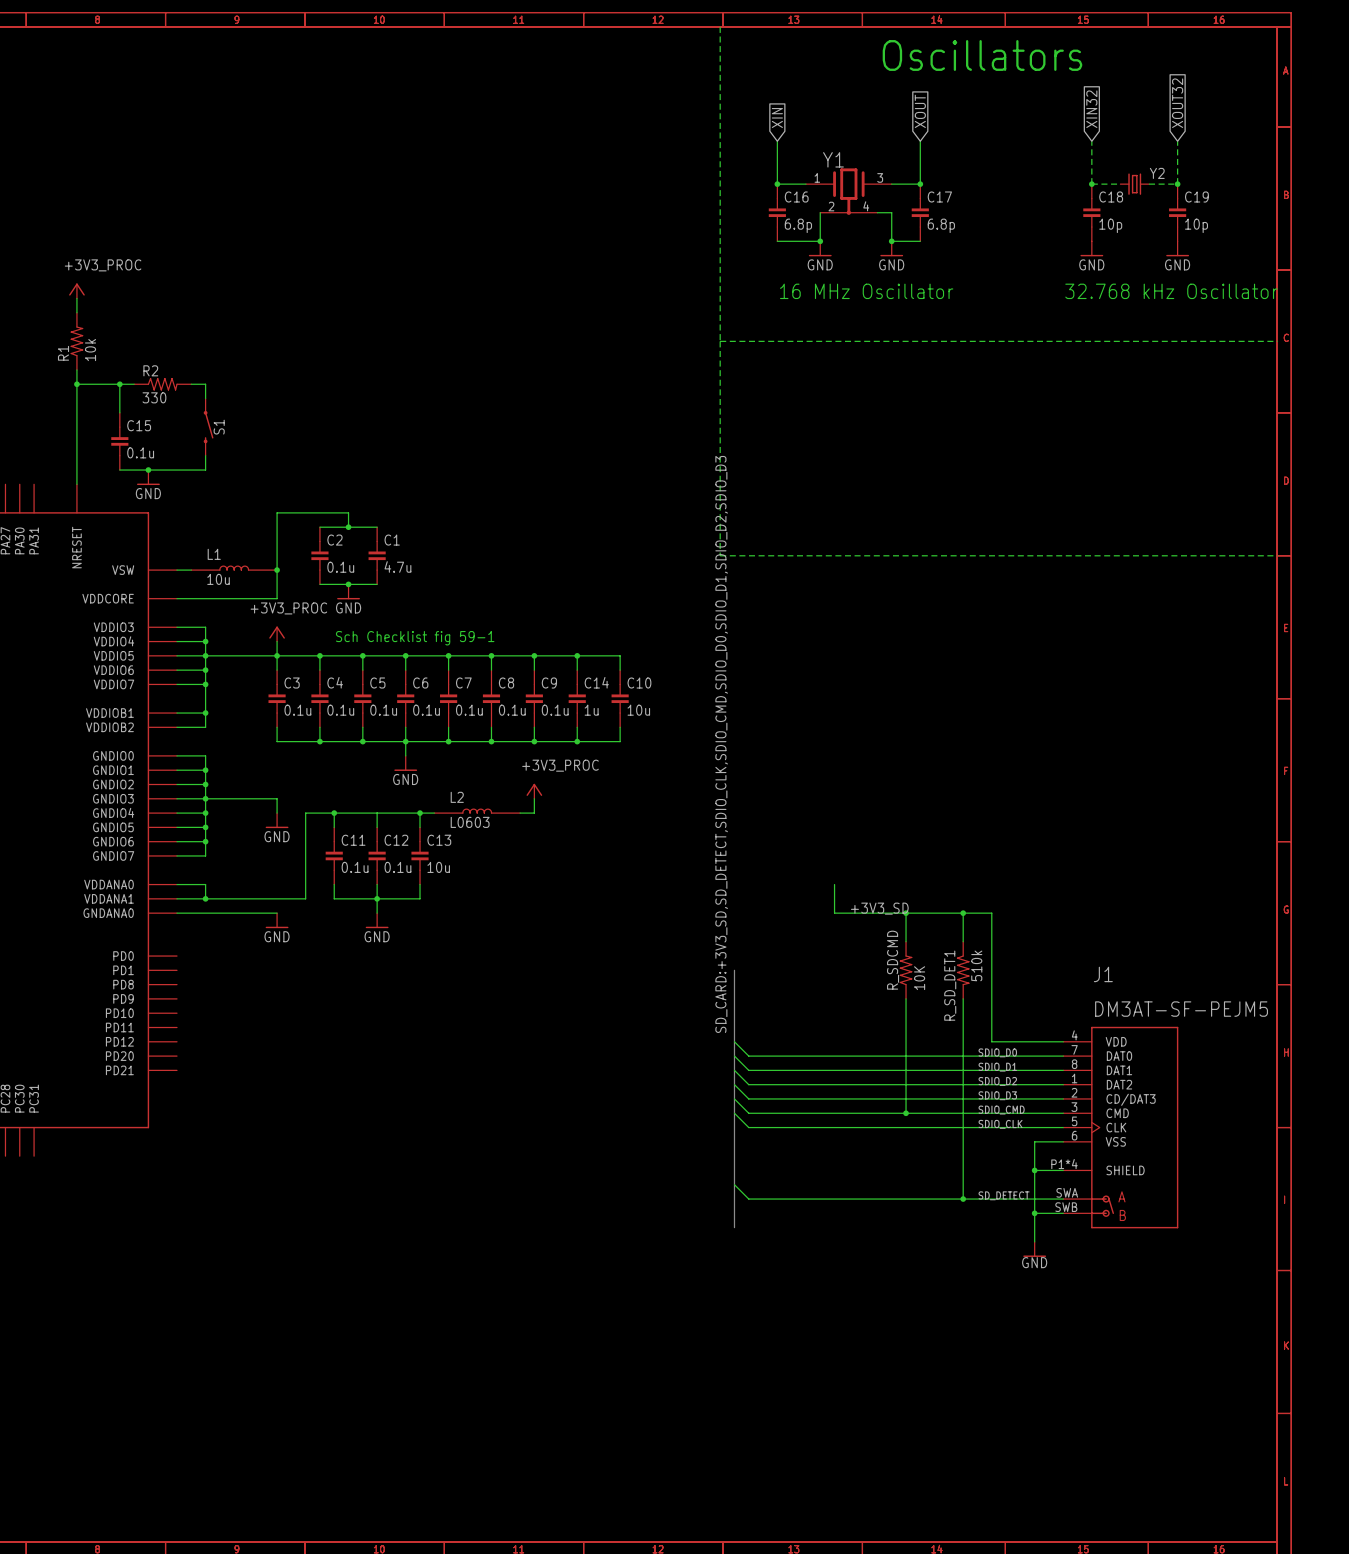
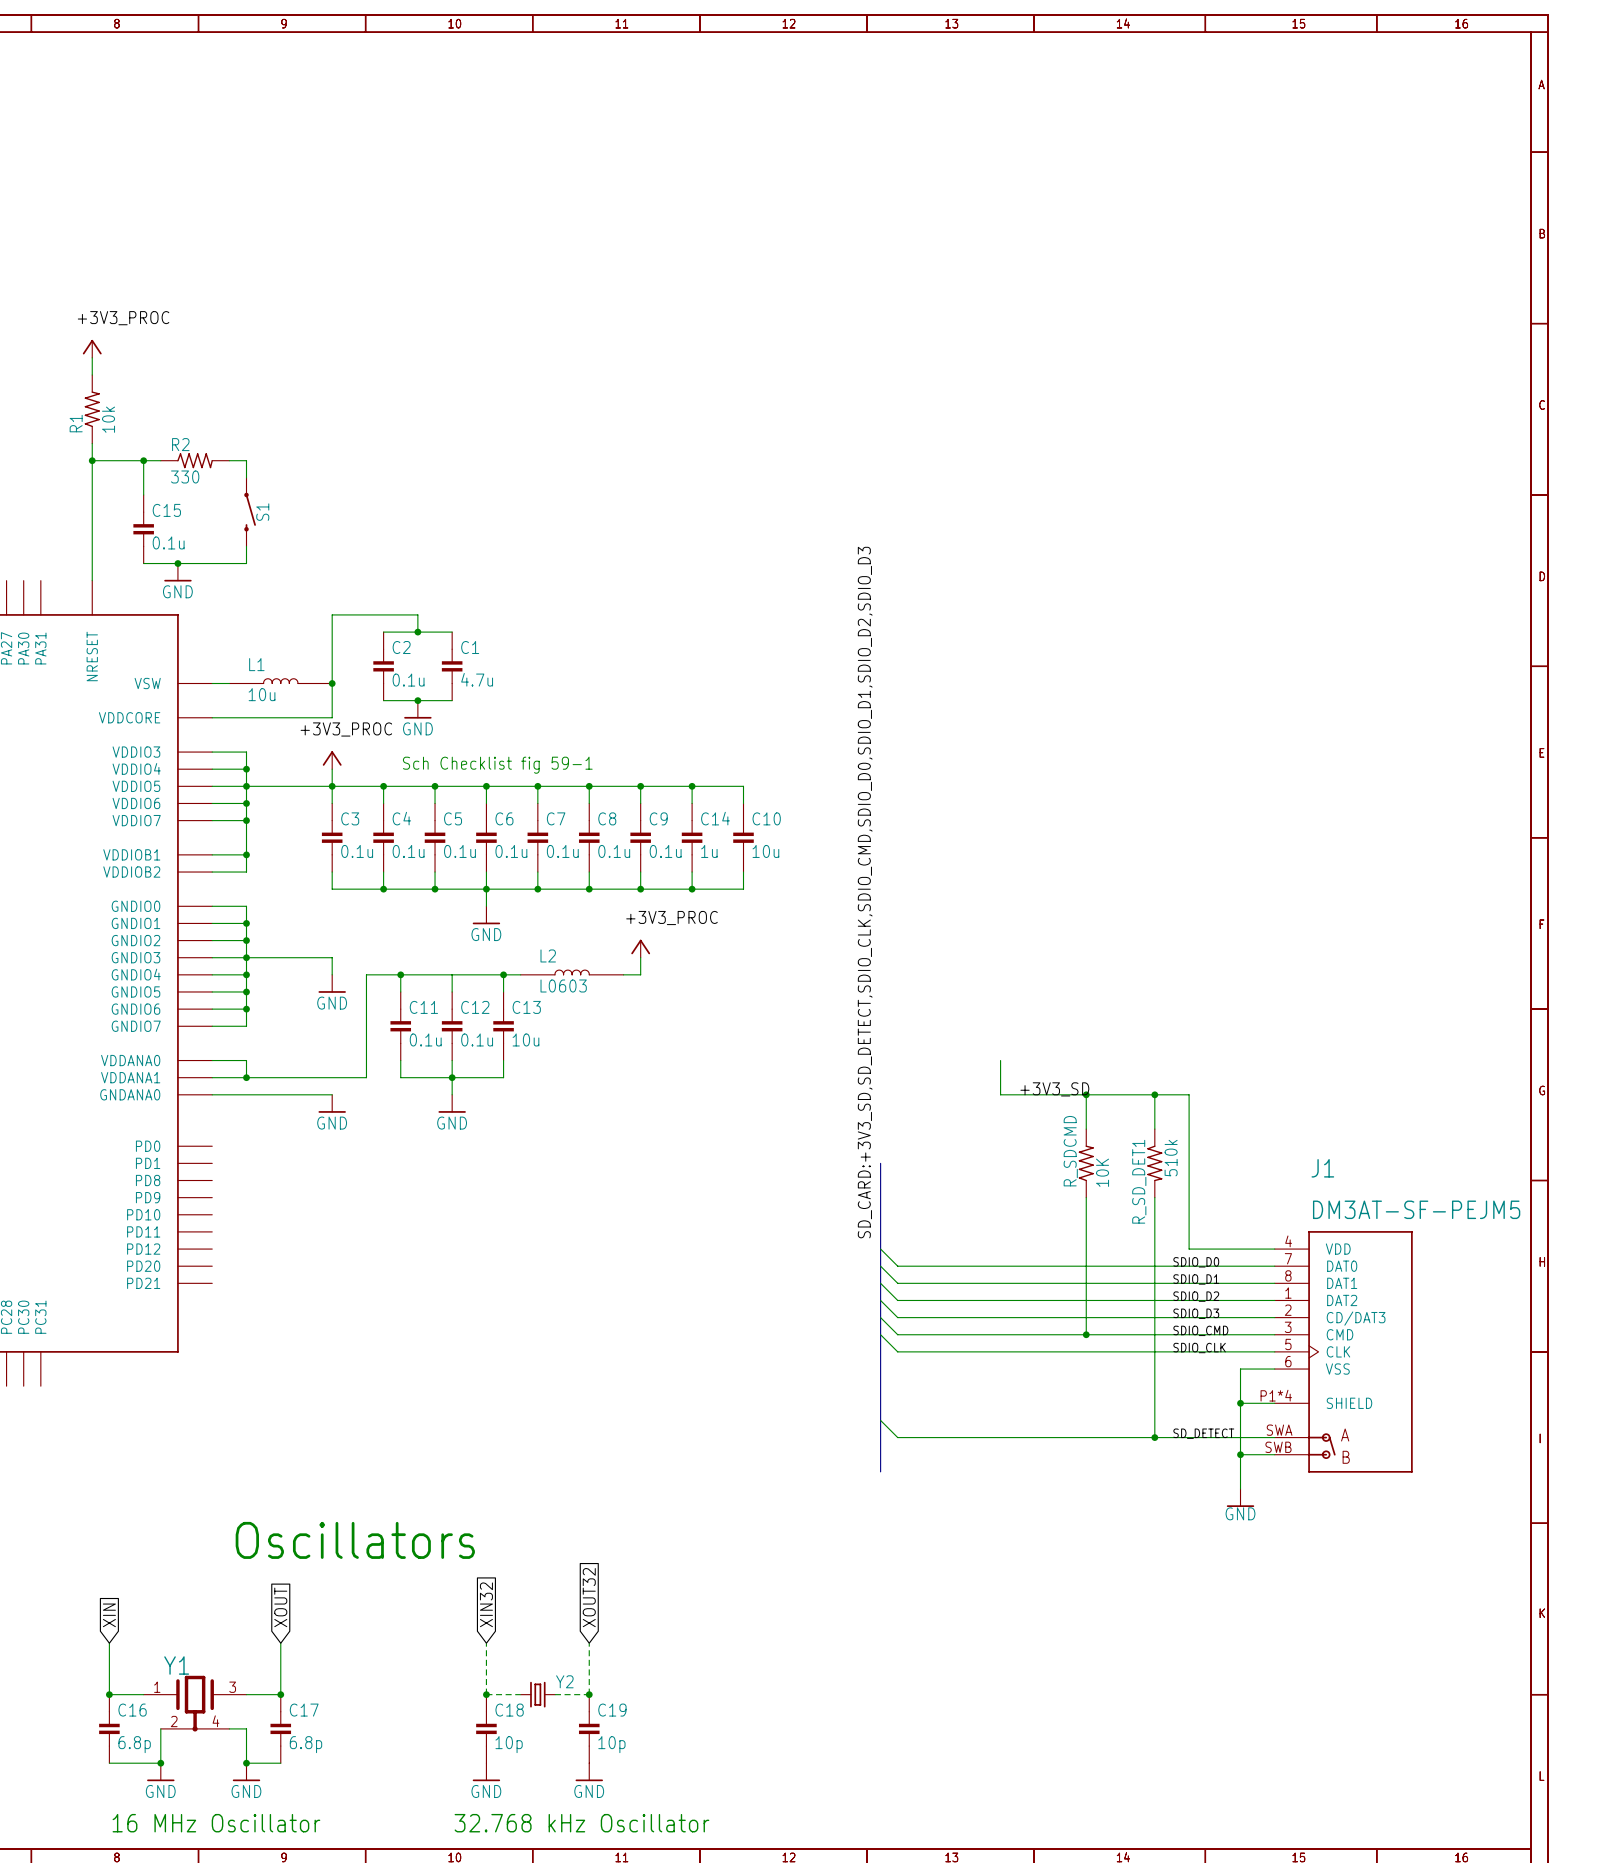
wire: (720, 26) (720, 555) (1277, 555) -> none
text: Oscillators (982, 55) -> none
global label: XOUT32 (1177, 103) -> none
global label: XIN32 (1091, 109) -> none
global label: XOUT (920, 111) -> none
global label: XIN (777, 118) -> none
wire: (777, 141) (777, 184) (805, 184) -> none
wire: (920, 141) (920, 184) (891, 184) -> none
wire: (1091, 141) (1091, 184) (1120, 184) -> none
wire: (1177, 141) (1177, 184) (1149, 184) -> none
junction: (777, 184) -> none
junction: (920, 184) -> none
junction: (1091, 184) -> none
Y2 position: (1134, 184) -> (537, 1694)
junction: (1177, 184) -> none
Y1 position: (848, 191) -> (195, 1703)
C16 position: (777, 212) -> (109, 1728)
wire: (820, 212) (820, 241) (777, 241) -> none
wire: (877, 212) (891, 212) (891, 241) (920, 241) -> none
C17 position: (920, 212) -> (280, 1728)
C18 position: (1091, 212) -> (486, 1728)
C19 position: (1177, 212) -> (589, 1728)
junction: (820, 241) -> none
junction: (891, 241) -> none
power symbol: GND (820, 248) -> none
power symbol: GND (891, 248) -> none
power symbol: GND (1091, 248) -> none
power symbol: GND (1177, 248) -> none
text: 16 MHz Oscillator (866, 291) -> none
text: 32.768 kHz Oscillator (1171, 291) -> none
wire: (720, 341) (1277, 341) -> none
text: none -> Oscillators (355, 1540)
global label: none -> XOUT32 (589, 1597)
global label: none -> XIN32 (486, 1604)
global label: none -> XOUT (280, 1607)
global label: none -> XIN (109, 1615)
wire: none -> (109, 1643) (109, 1694) (143, 1694)
wire: none -> (280, 1643) (280, 1694) (246, 1694)
wire: none -> (486, 1643) (486, 1694) (520, 1694)
wire: none -> (589, 1643) (589, 1694) (554, 1694)
junction: none -> (109, 1694)
junction: none -> (280, 1694)
junction: none -> (486, 1694)
junction: none -> (589, 1694)
wire: none -> (160, 1728) (160, 1763) (109, 1763)
wire: none -> (229, 1728) (246, 1728) (246, 1763) (280, 1763)
junction: none -> (160, 1763)
junction: none -> (246, 1763)
power symbol: none -> GND (160, 1772)
power symbol: none -> GND (246, 1772)
power symbol: none -> GND (486, 1772)
power symbol: none -> GND (589, 1772)
text: none -> 16 MHz Oscillator (216, 1823)
text: none -> 32.768 kHz Oscillator (581, 1823)

